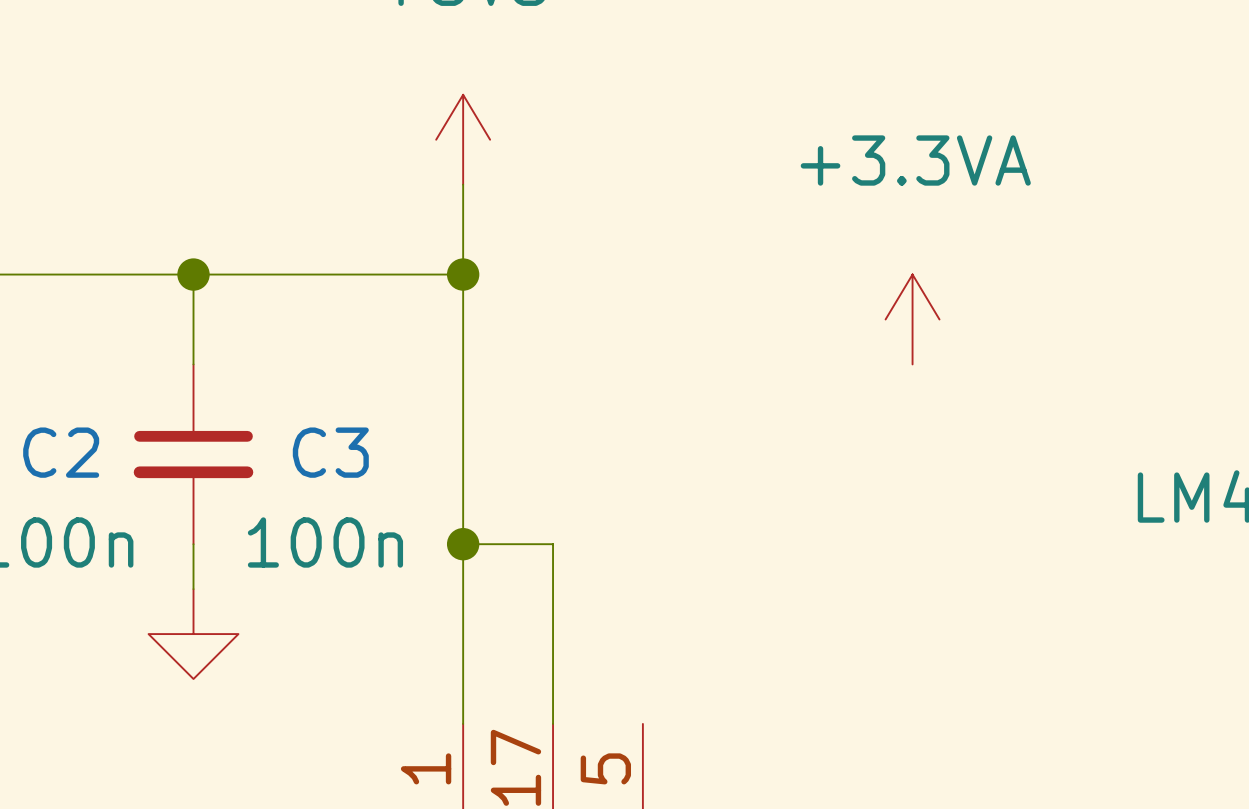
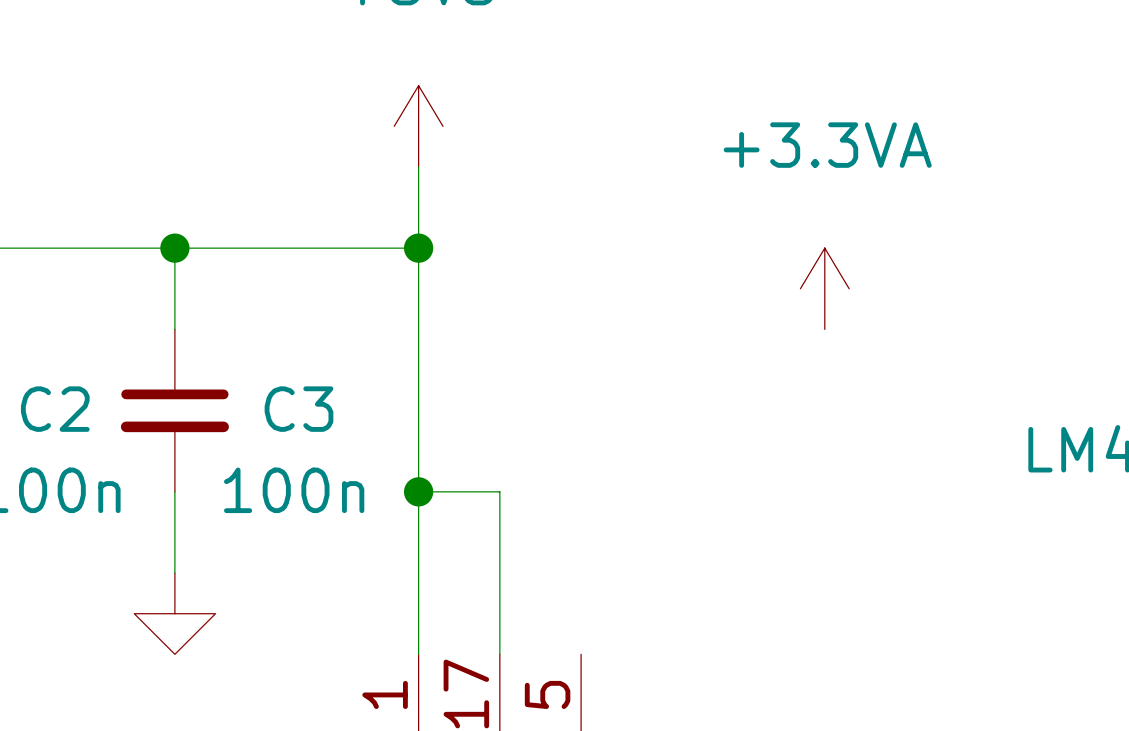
power symbol position: (193, 634) -> (174, 613)

